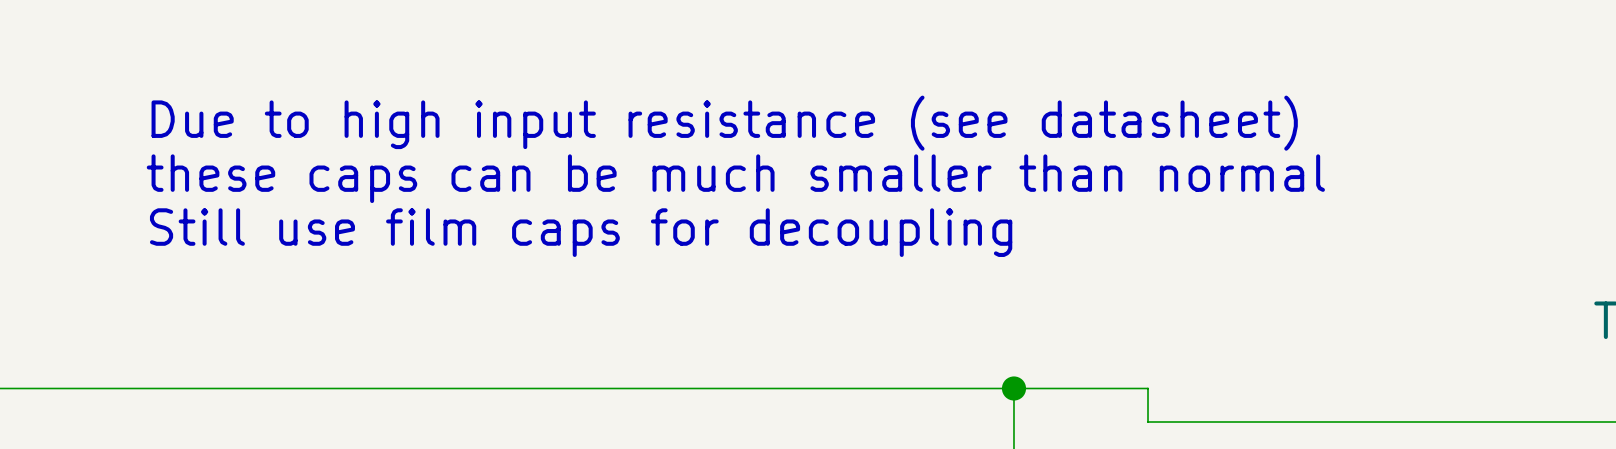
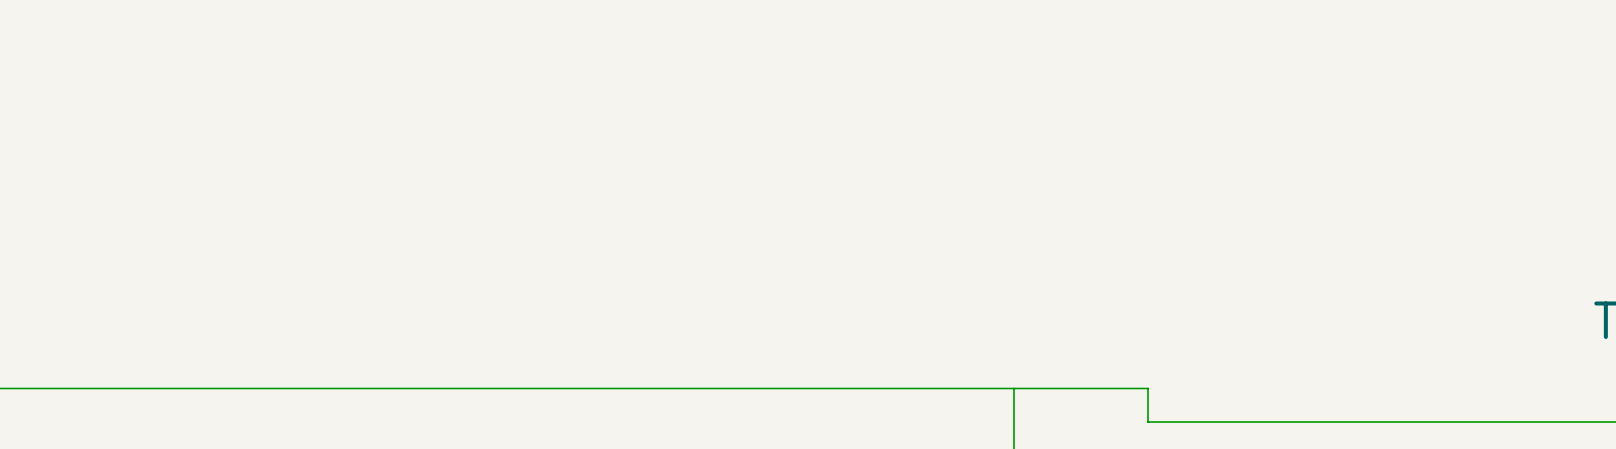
text: Due to high input resistance (see datasheet) (724, 123) -> none
text: these caps can be much smaller than normal (735, 178) -> none
text: Still use film caps for decoupling (581, 232) -> none
junction: (1013, 388) -> none

